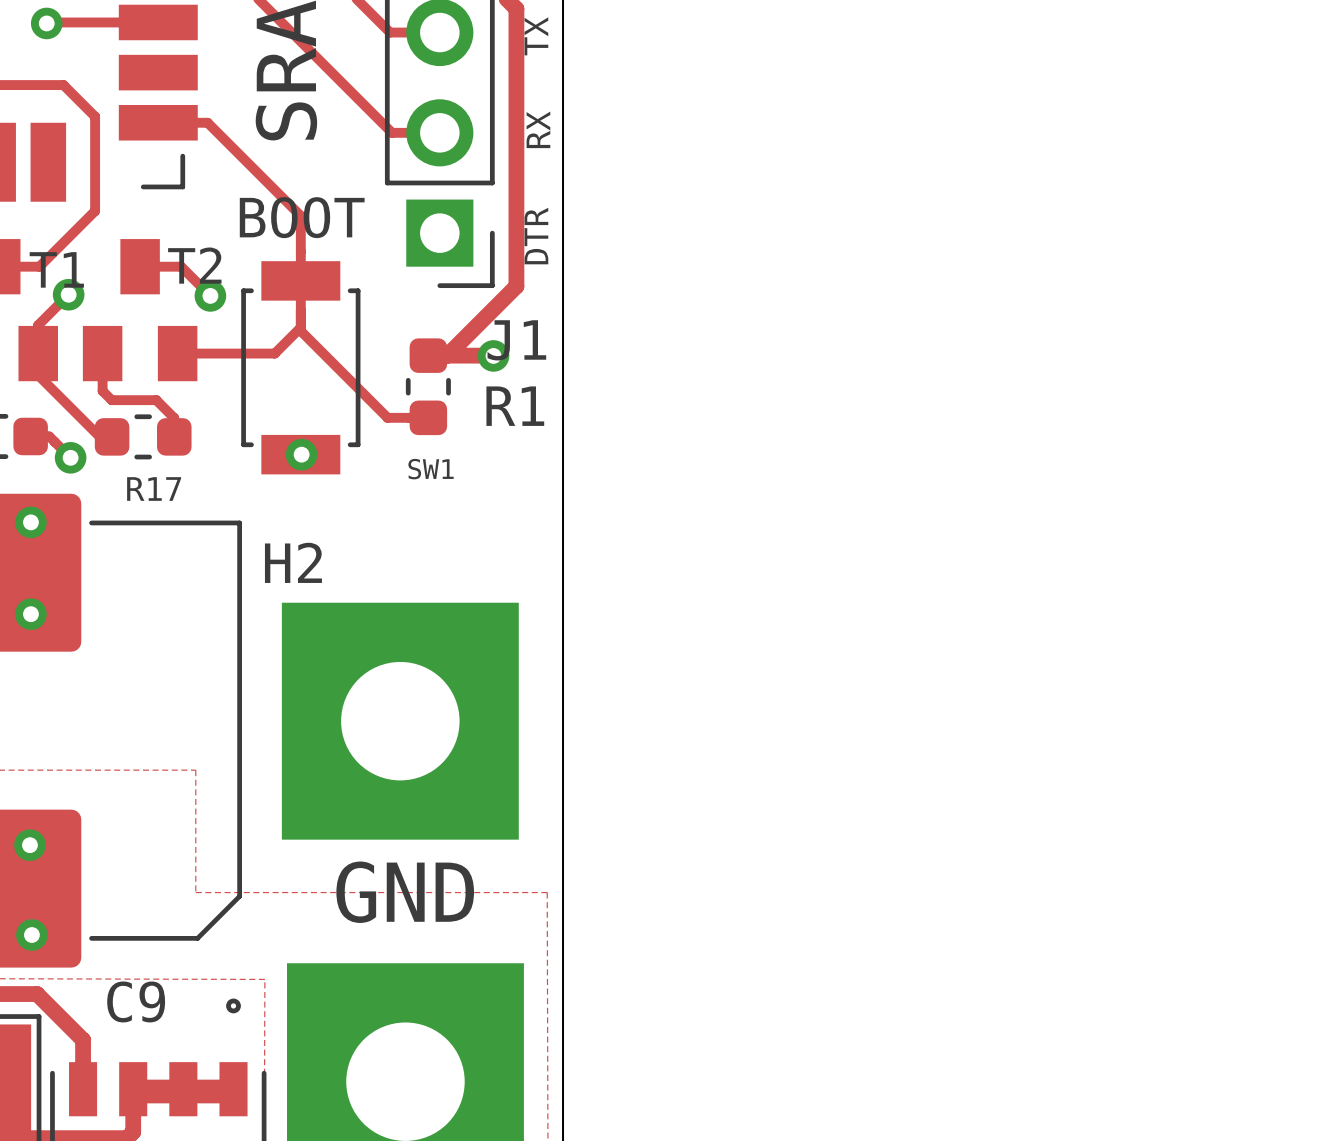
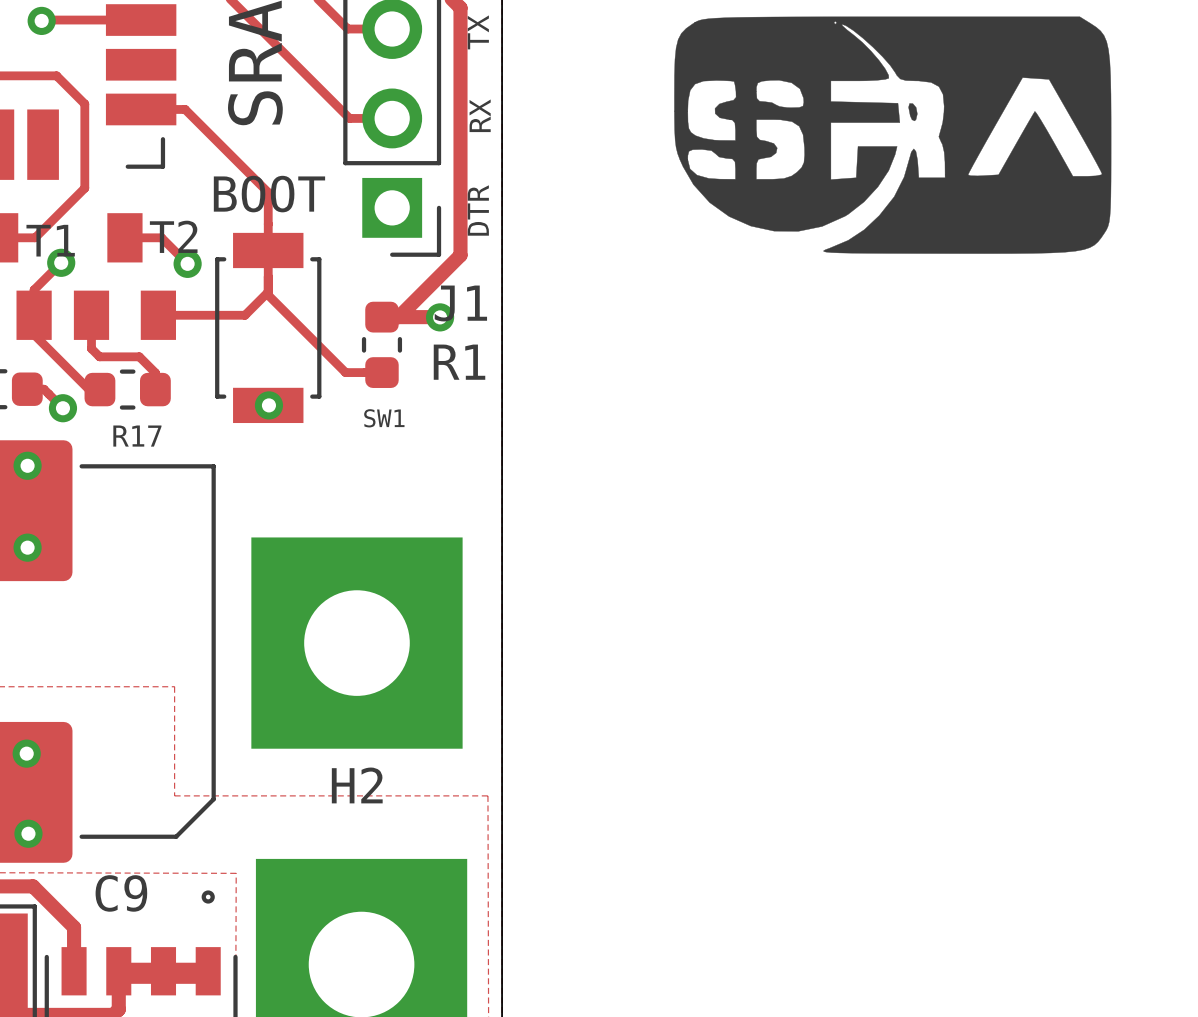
drawing: none -> [674, 16, 1112, 254]
H2 name position: H2 (293, 562) -> H2 (357, 785)
text: GND (405, 892) -> none

